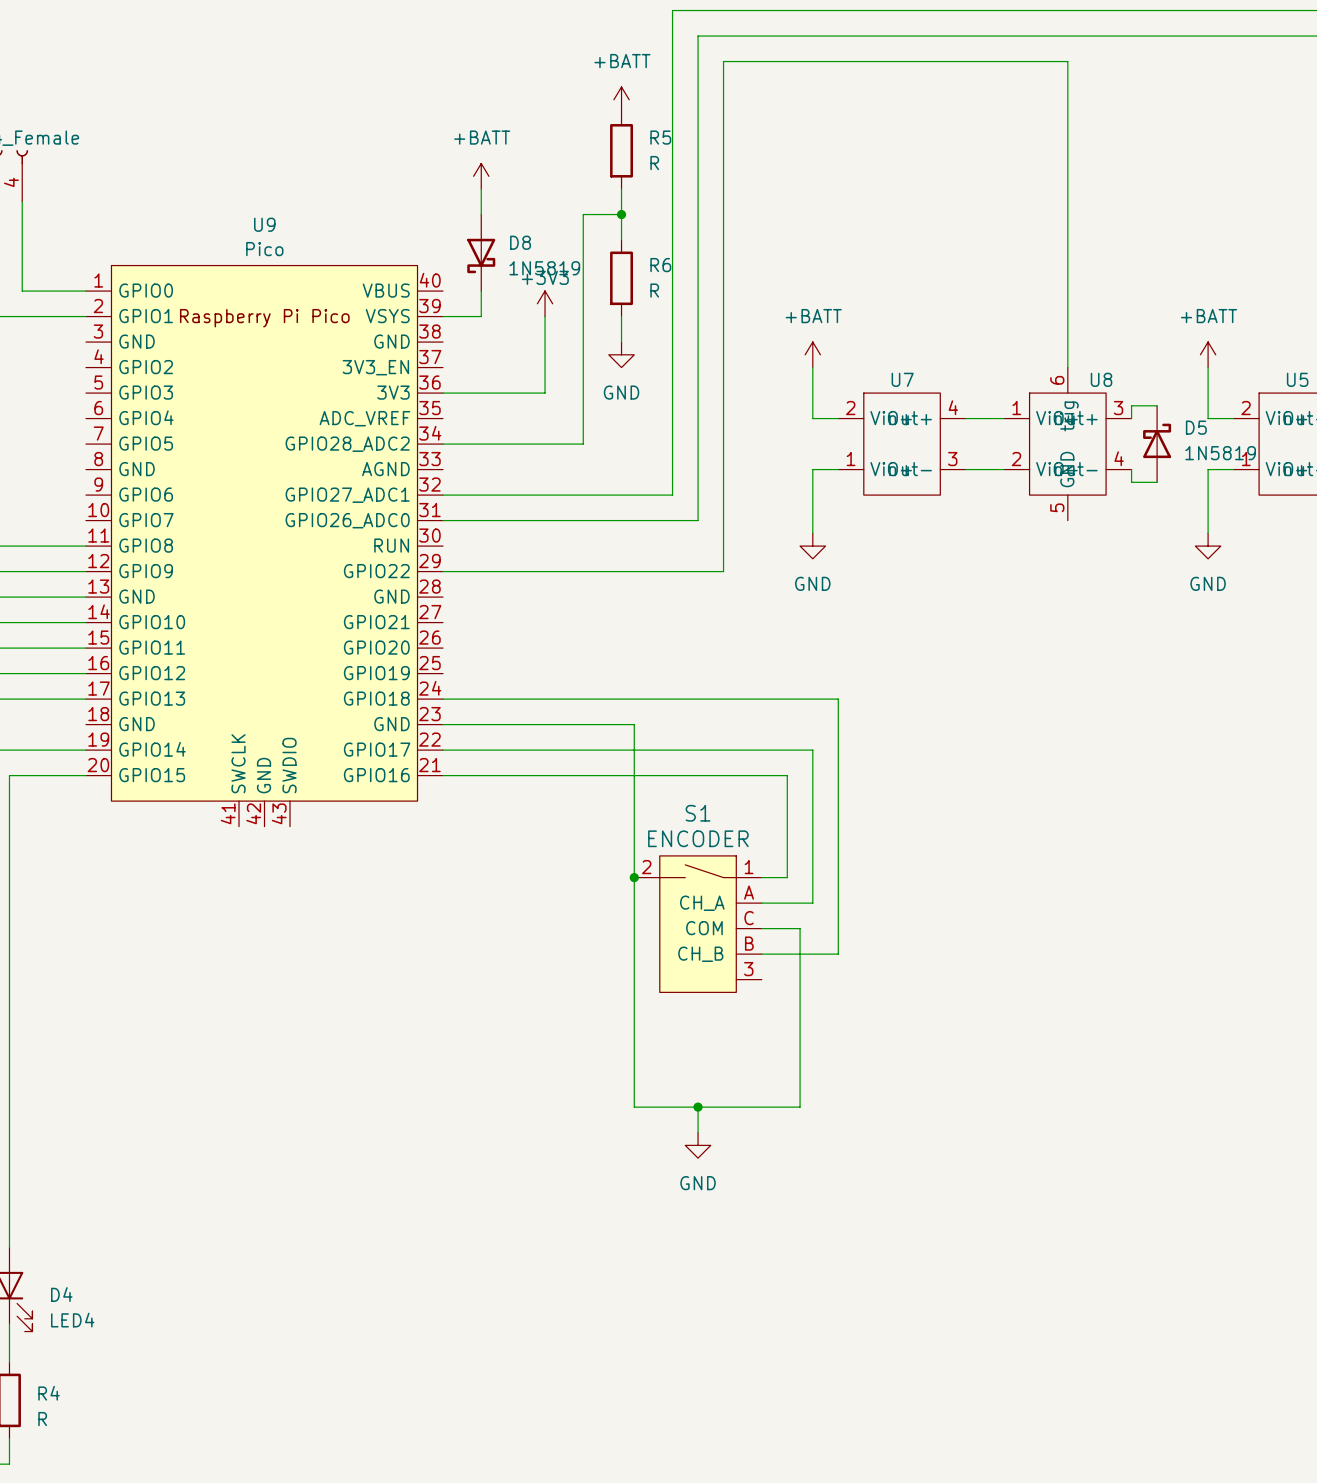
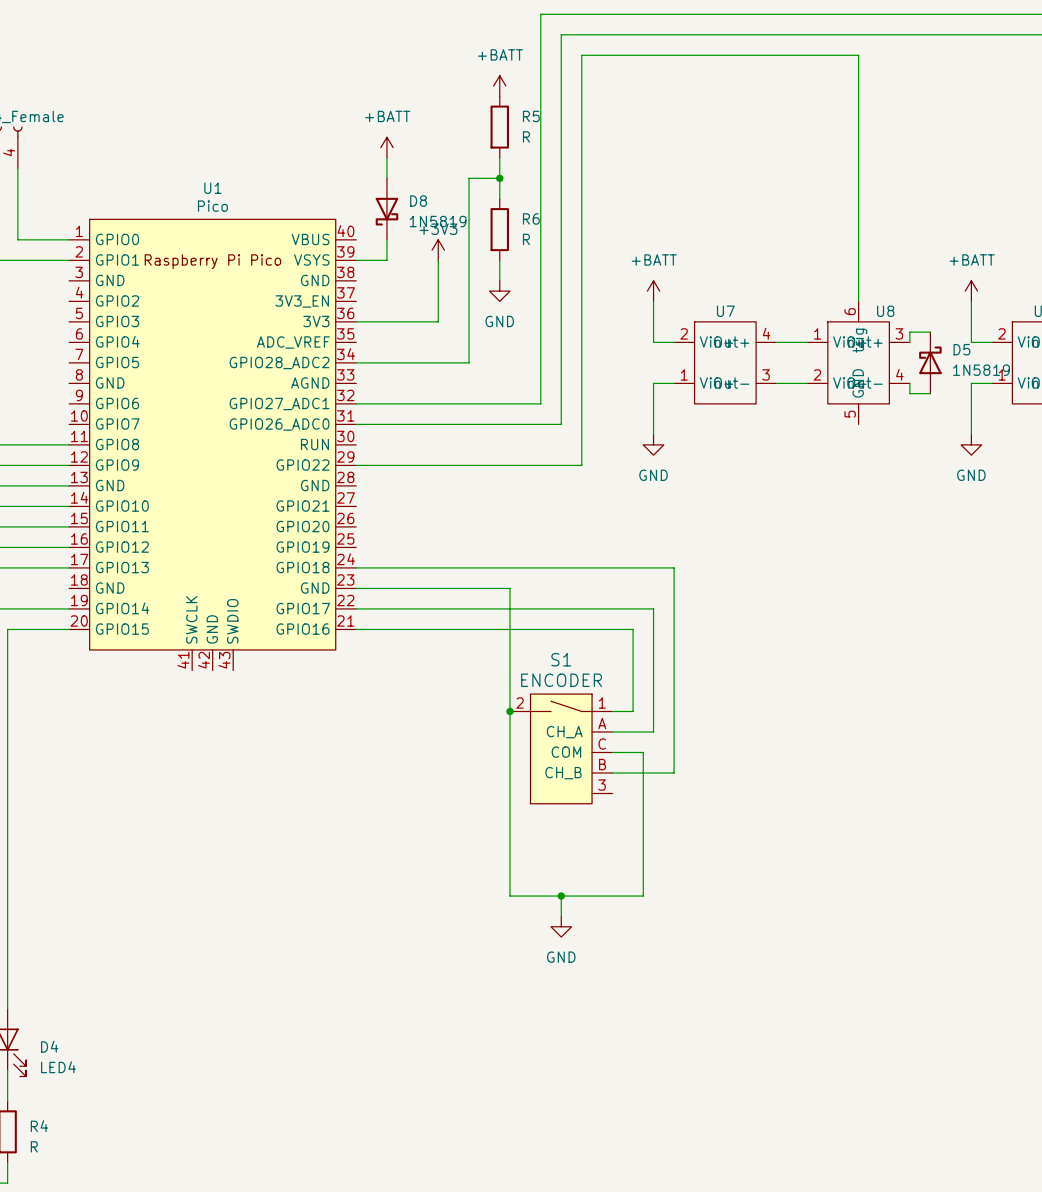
U9 name: U9 (264, 224) -> U1 (212, 188)

